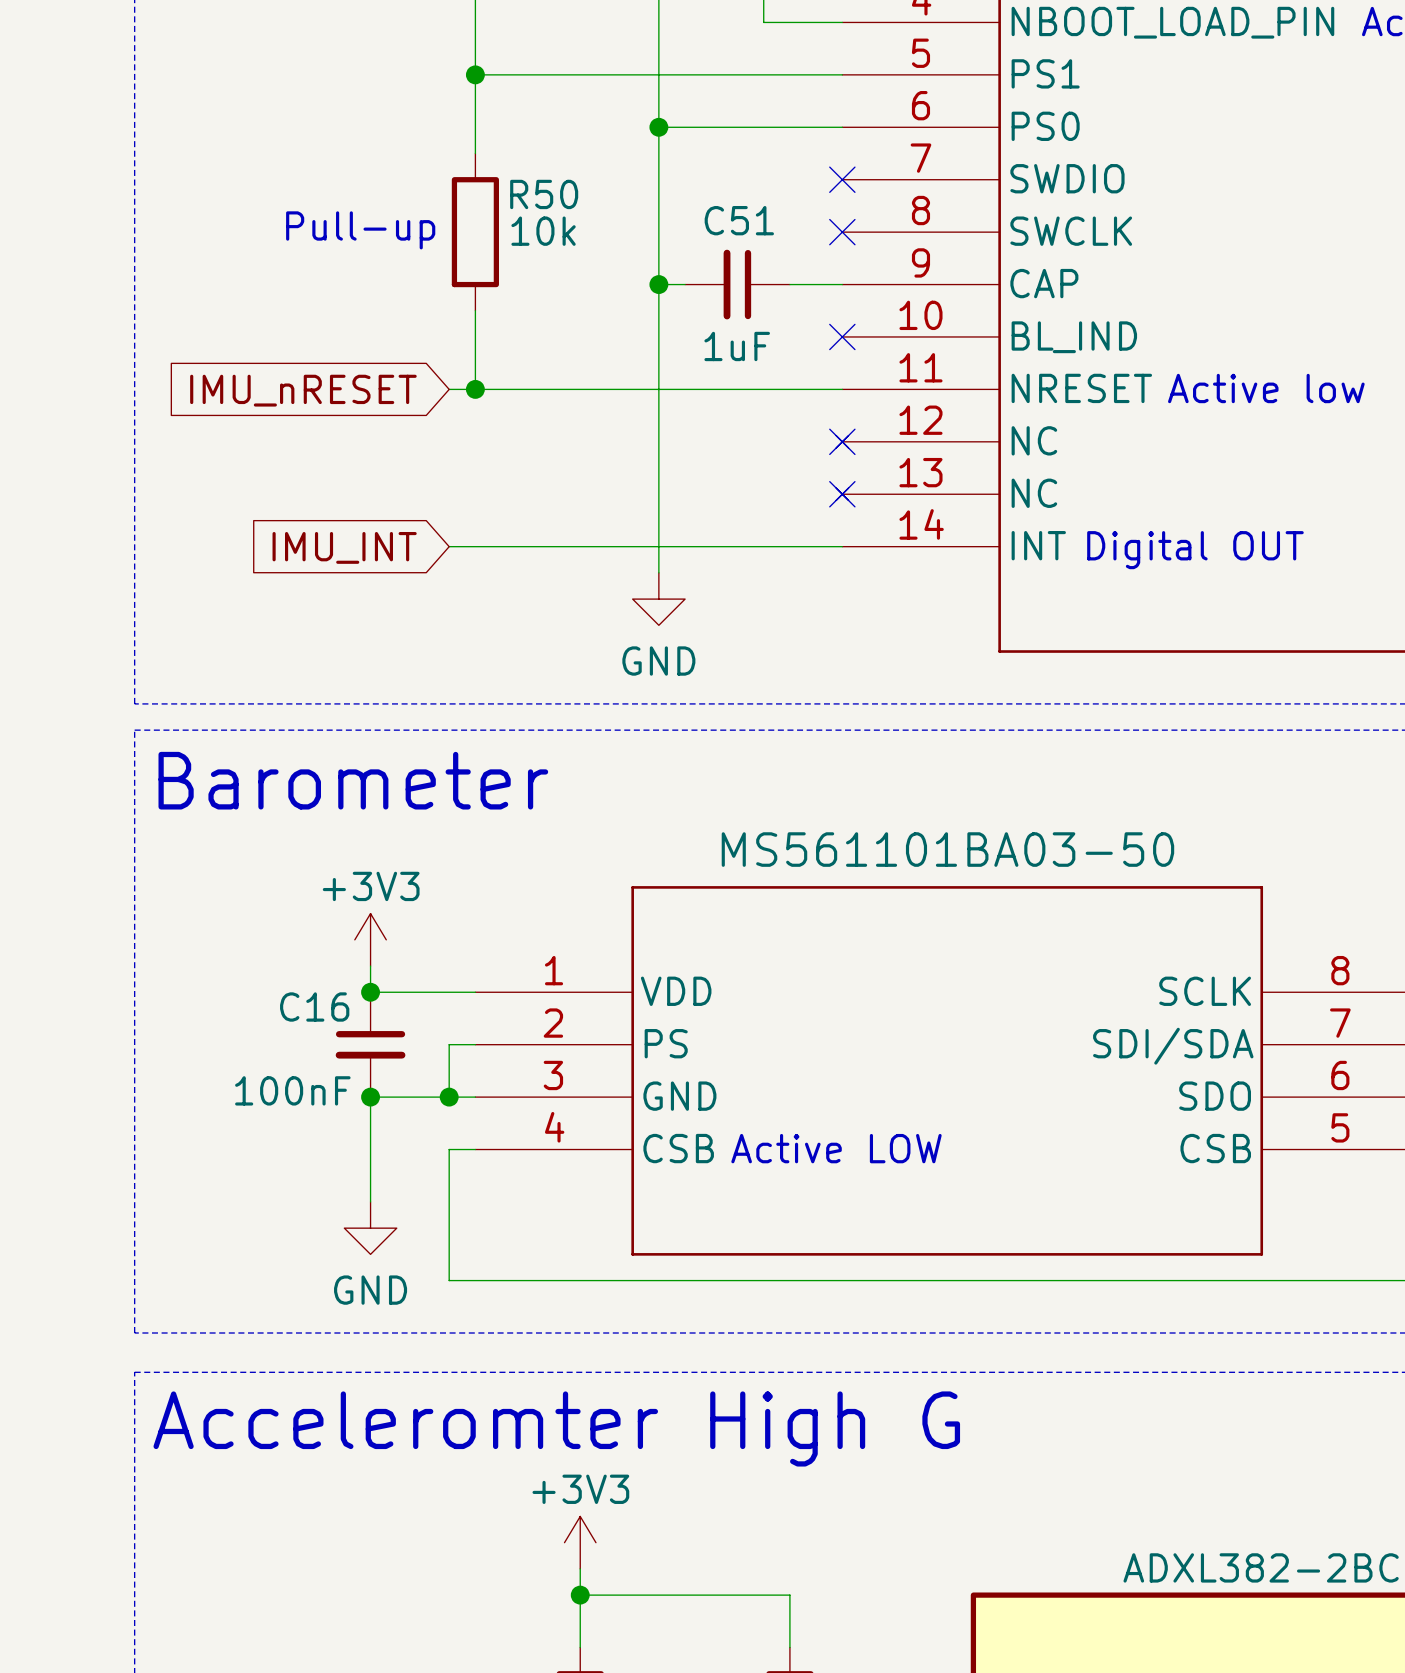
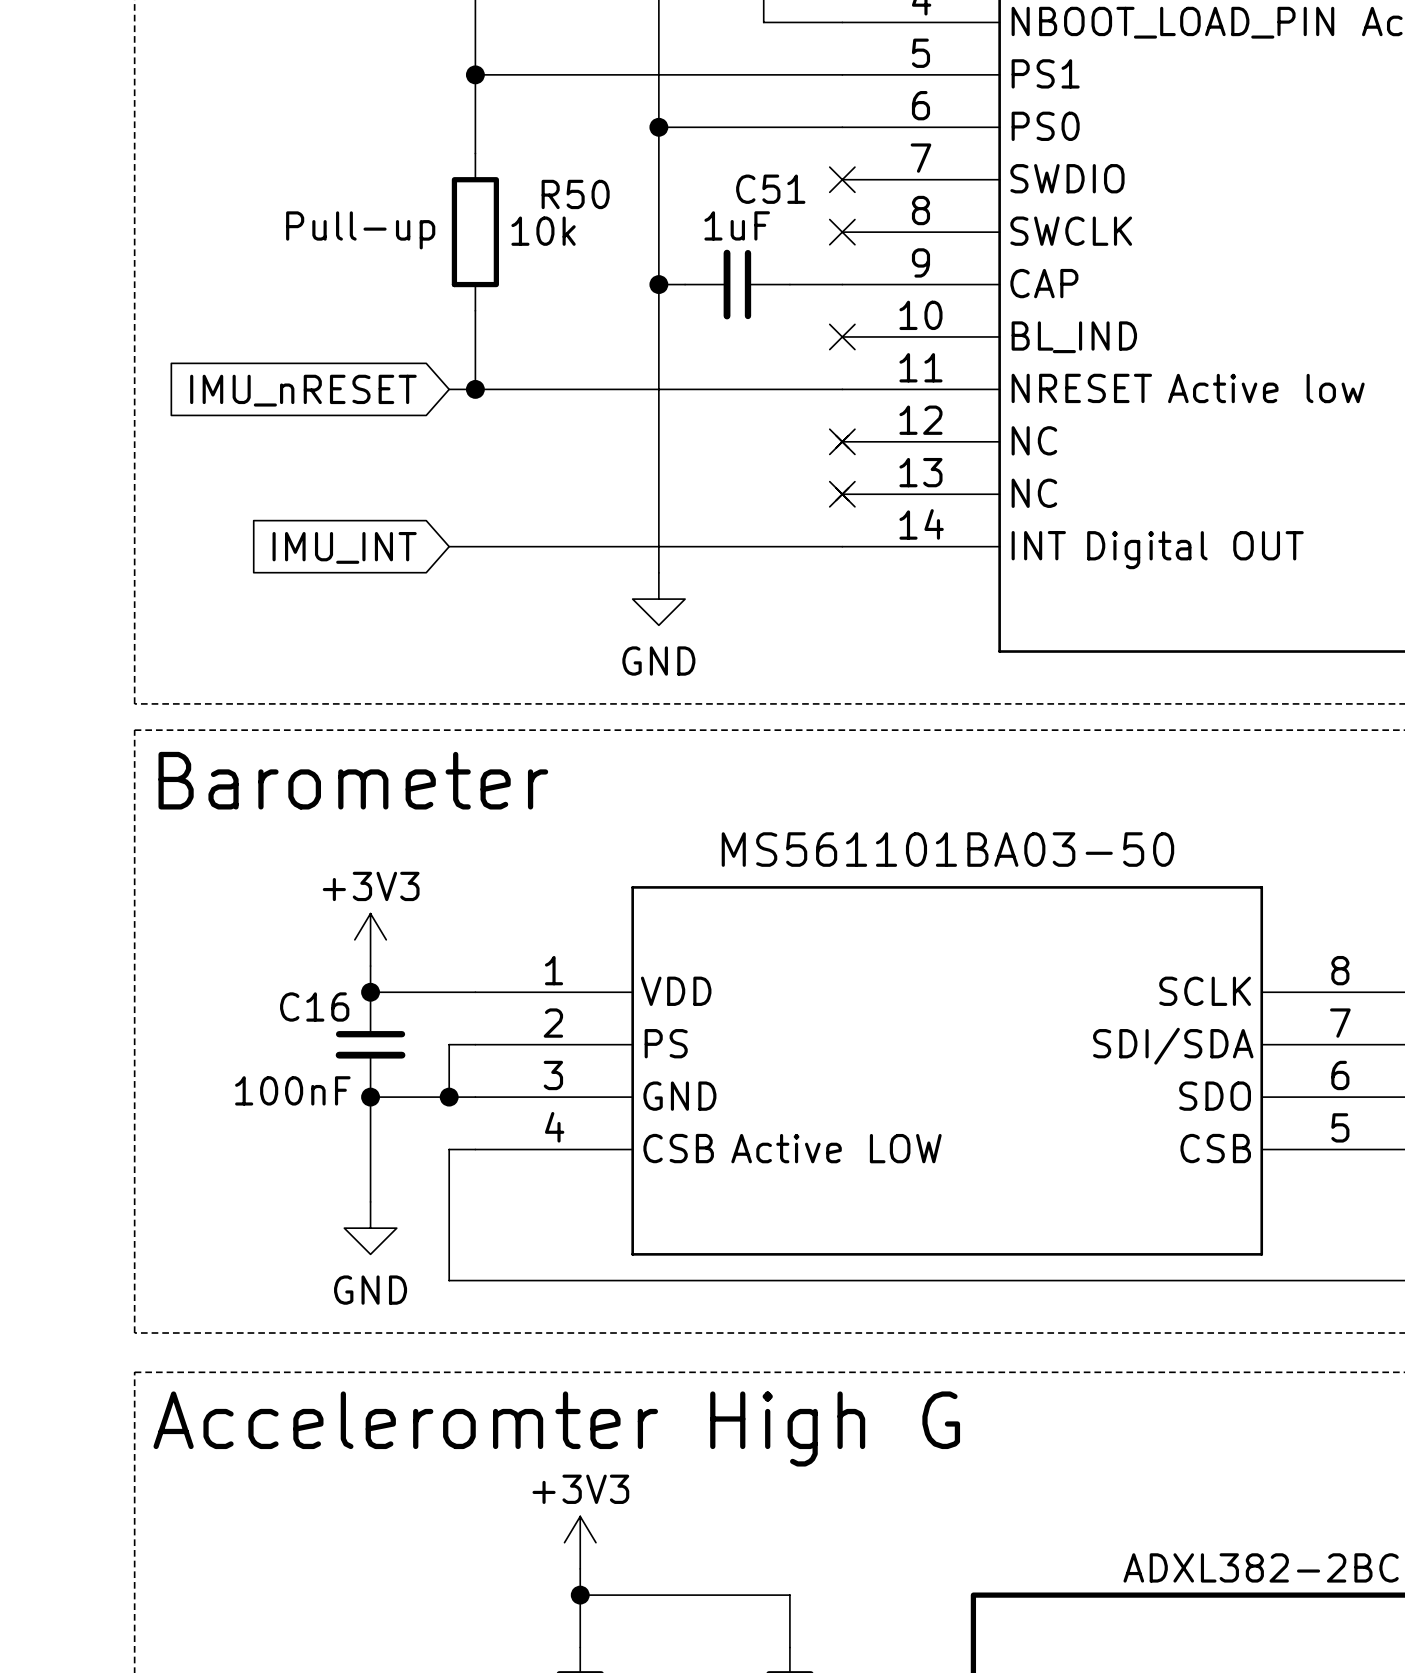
R50 name position: R50 (544, 194) -> R50 (575, 194)
C51 name position: C51 (739, 220) -> C51 (770, 189)
C51 value position: 1uF (737, 346) -> 1uF (737, 225)

